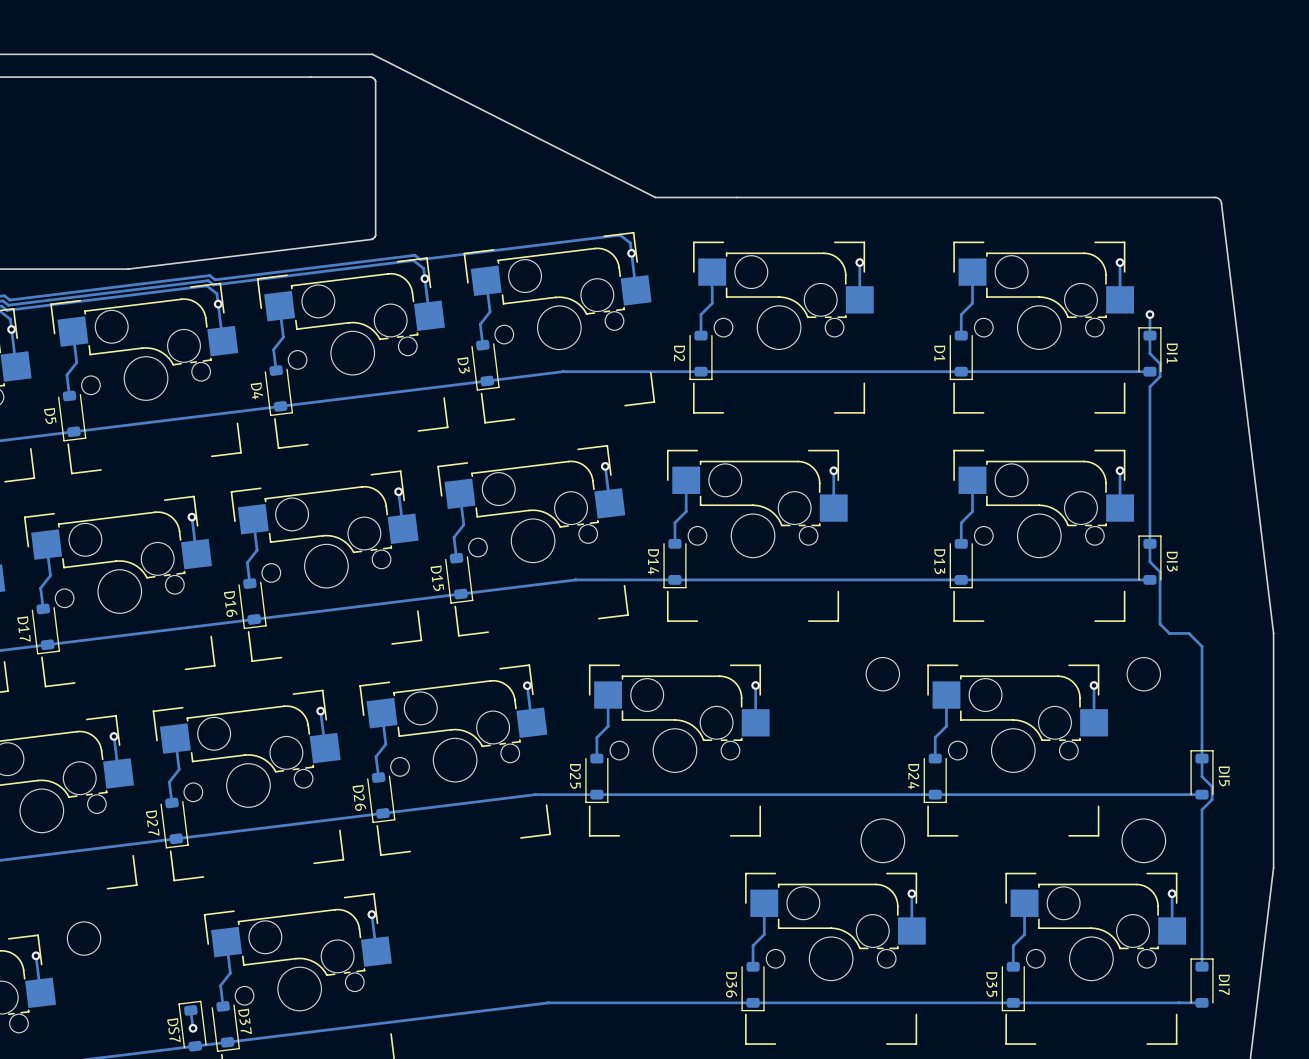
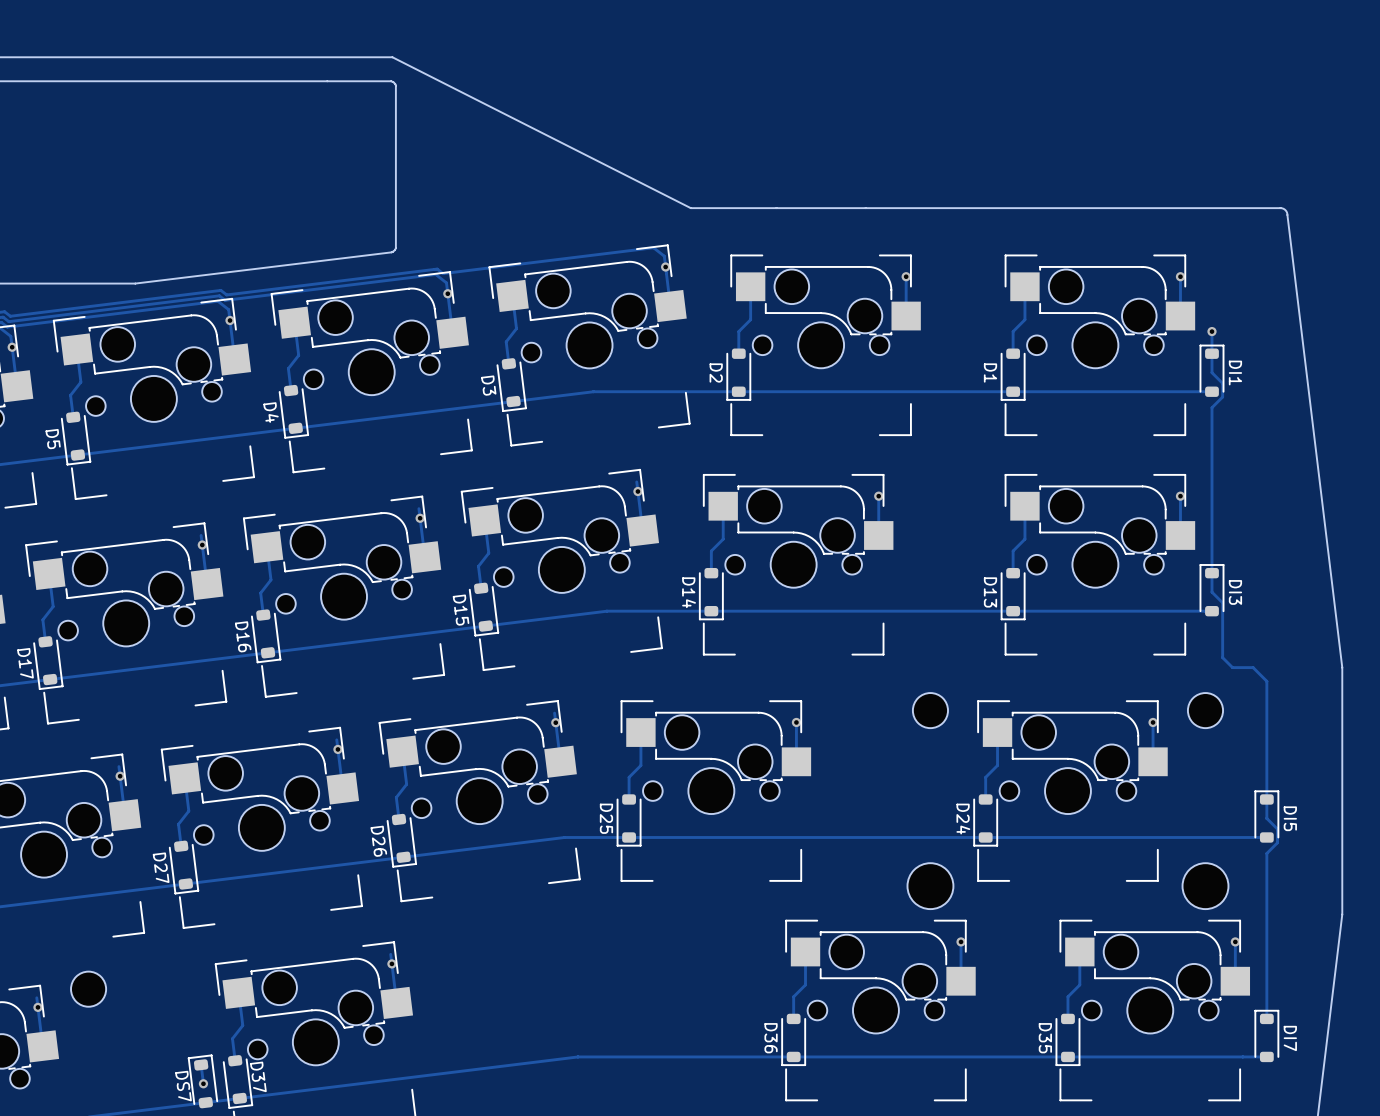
track: none -> (636, 481) (637, 491)
track: none -> (418, 508) (420, 518)
track: none -> (201, 535) (202, 545)
track: none -> (554, 713) (555, 722)
track: none -> (336, 739) (337, 749)
track: none -> (118, 766) (120, 776)
track: none -> (390, 954) (391, 963)
track: none -> (36, 997) (37, 1007)

